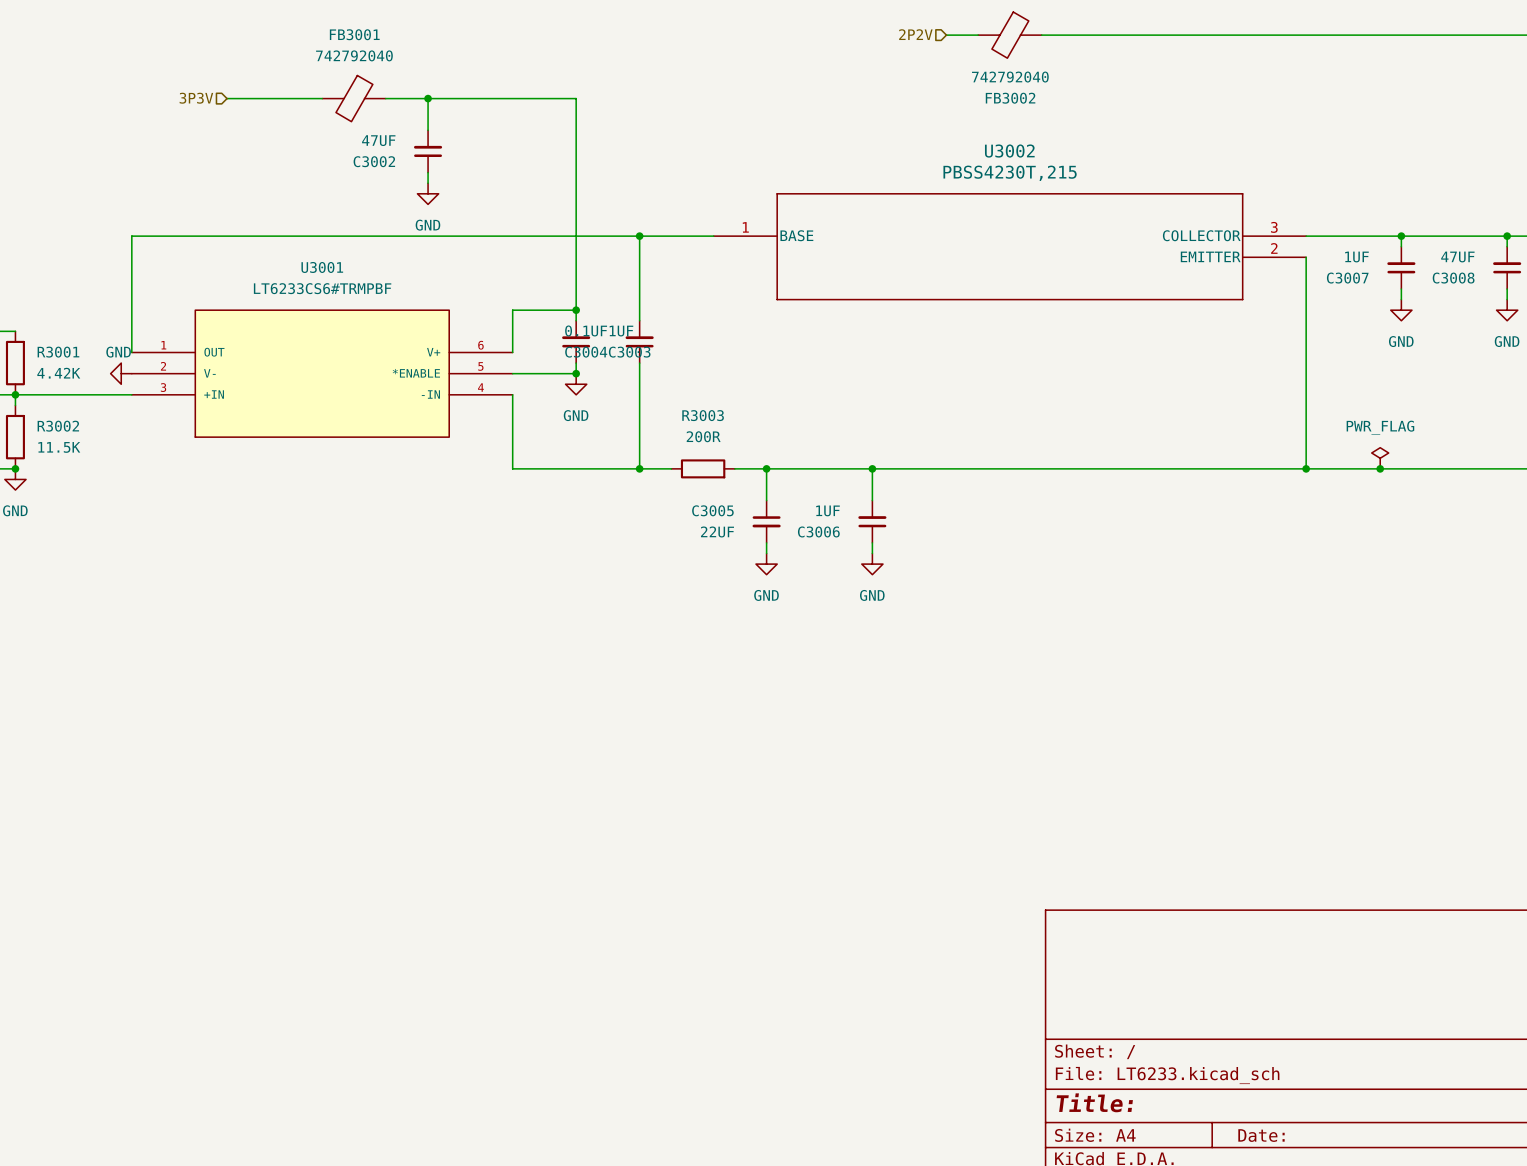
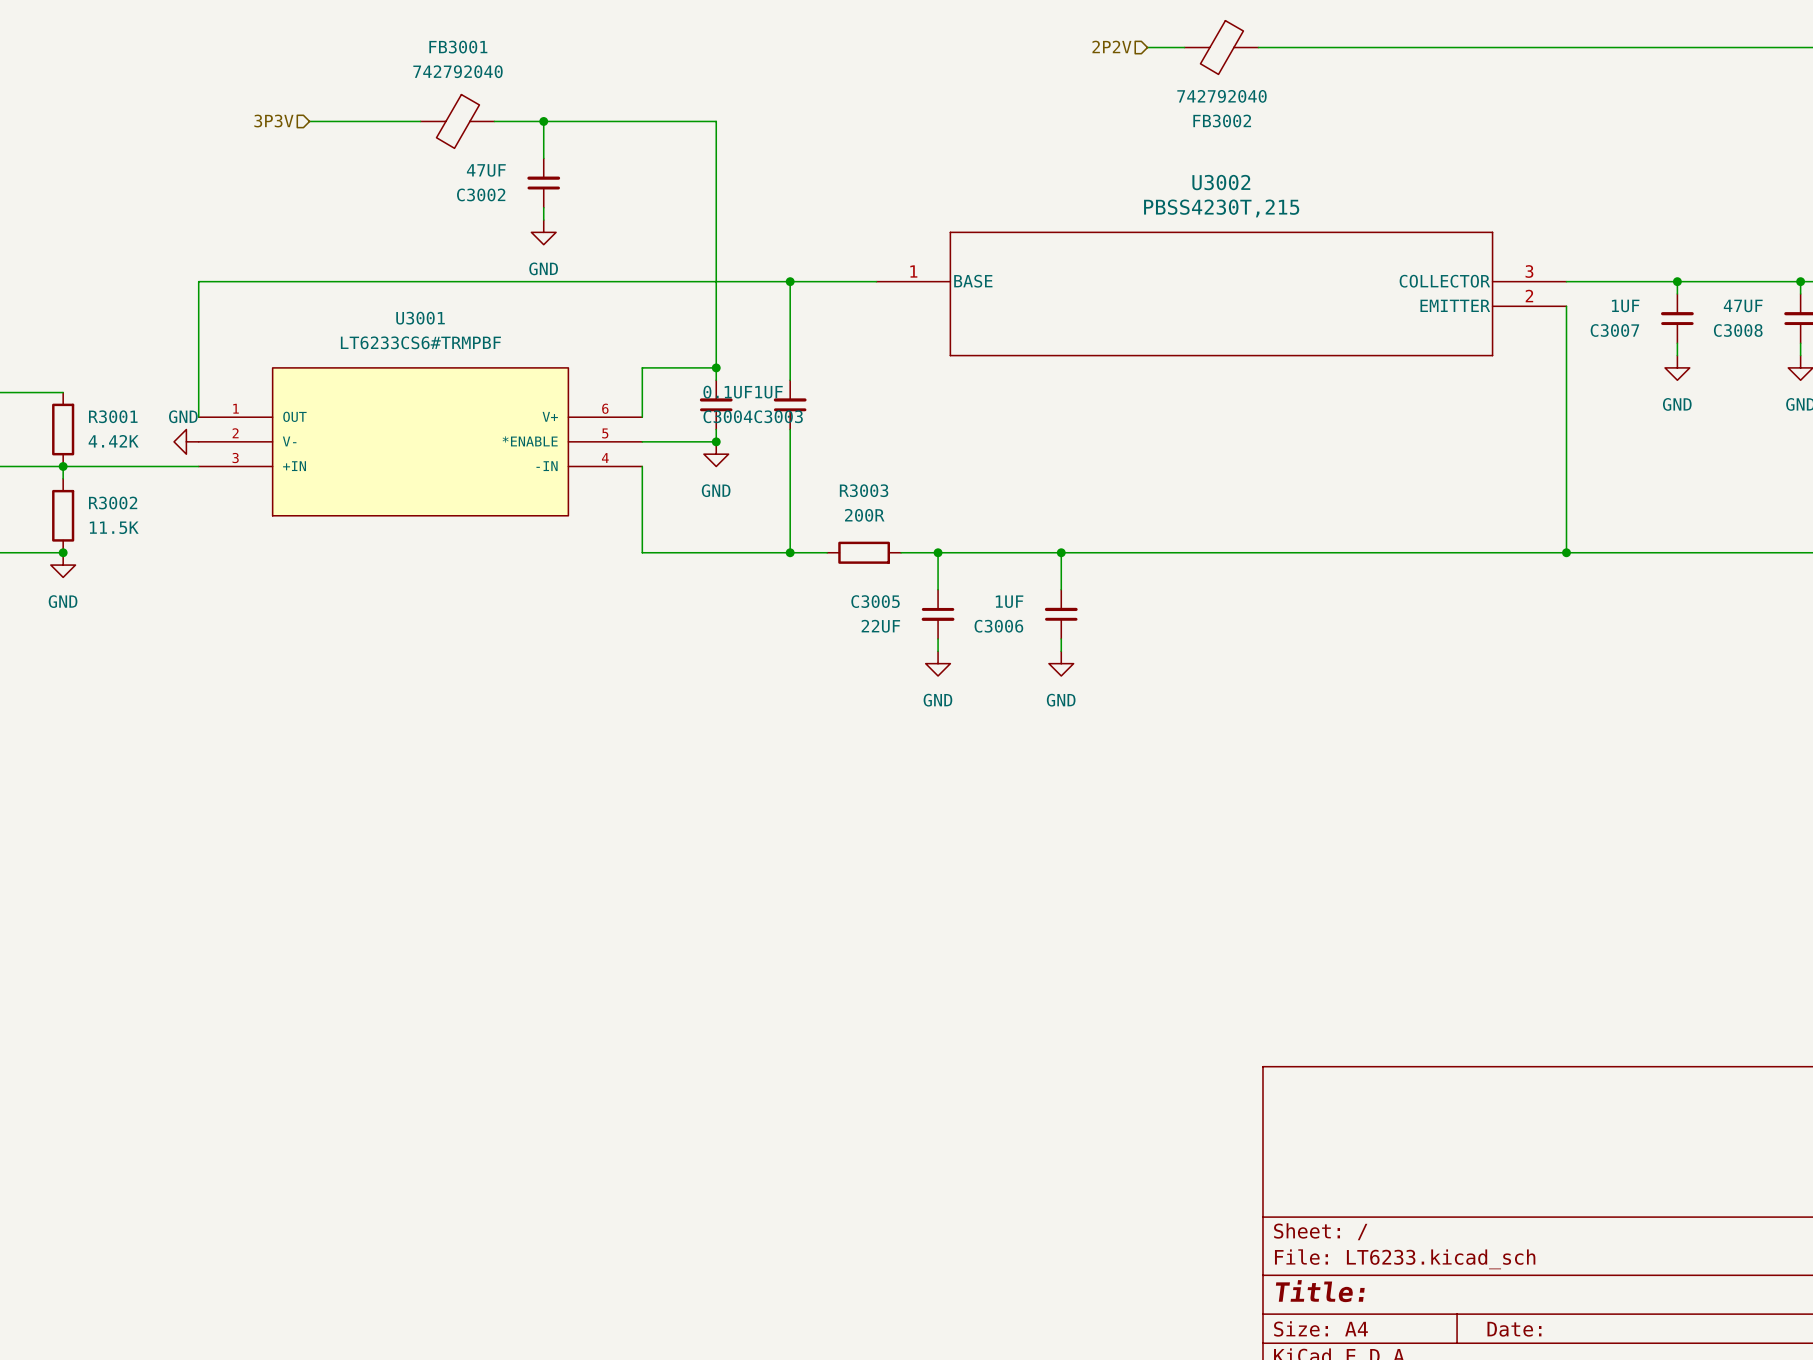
power symbol: PWR_FLAG (1380, 458) -> none
junction: (1380, 468) -> none

